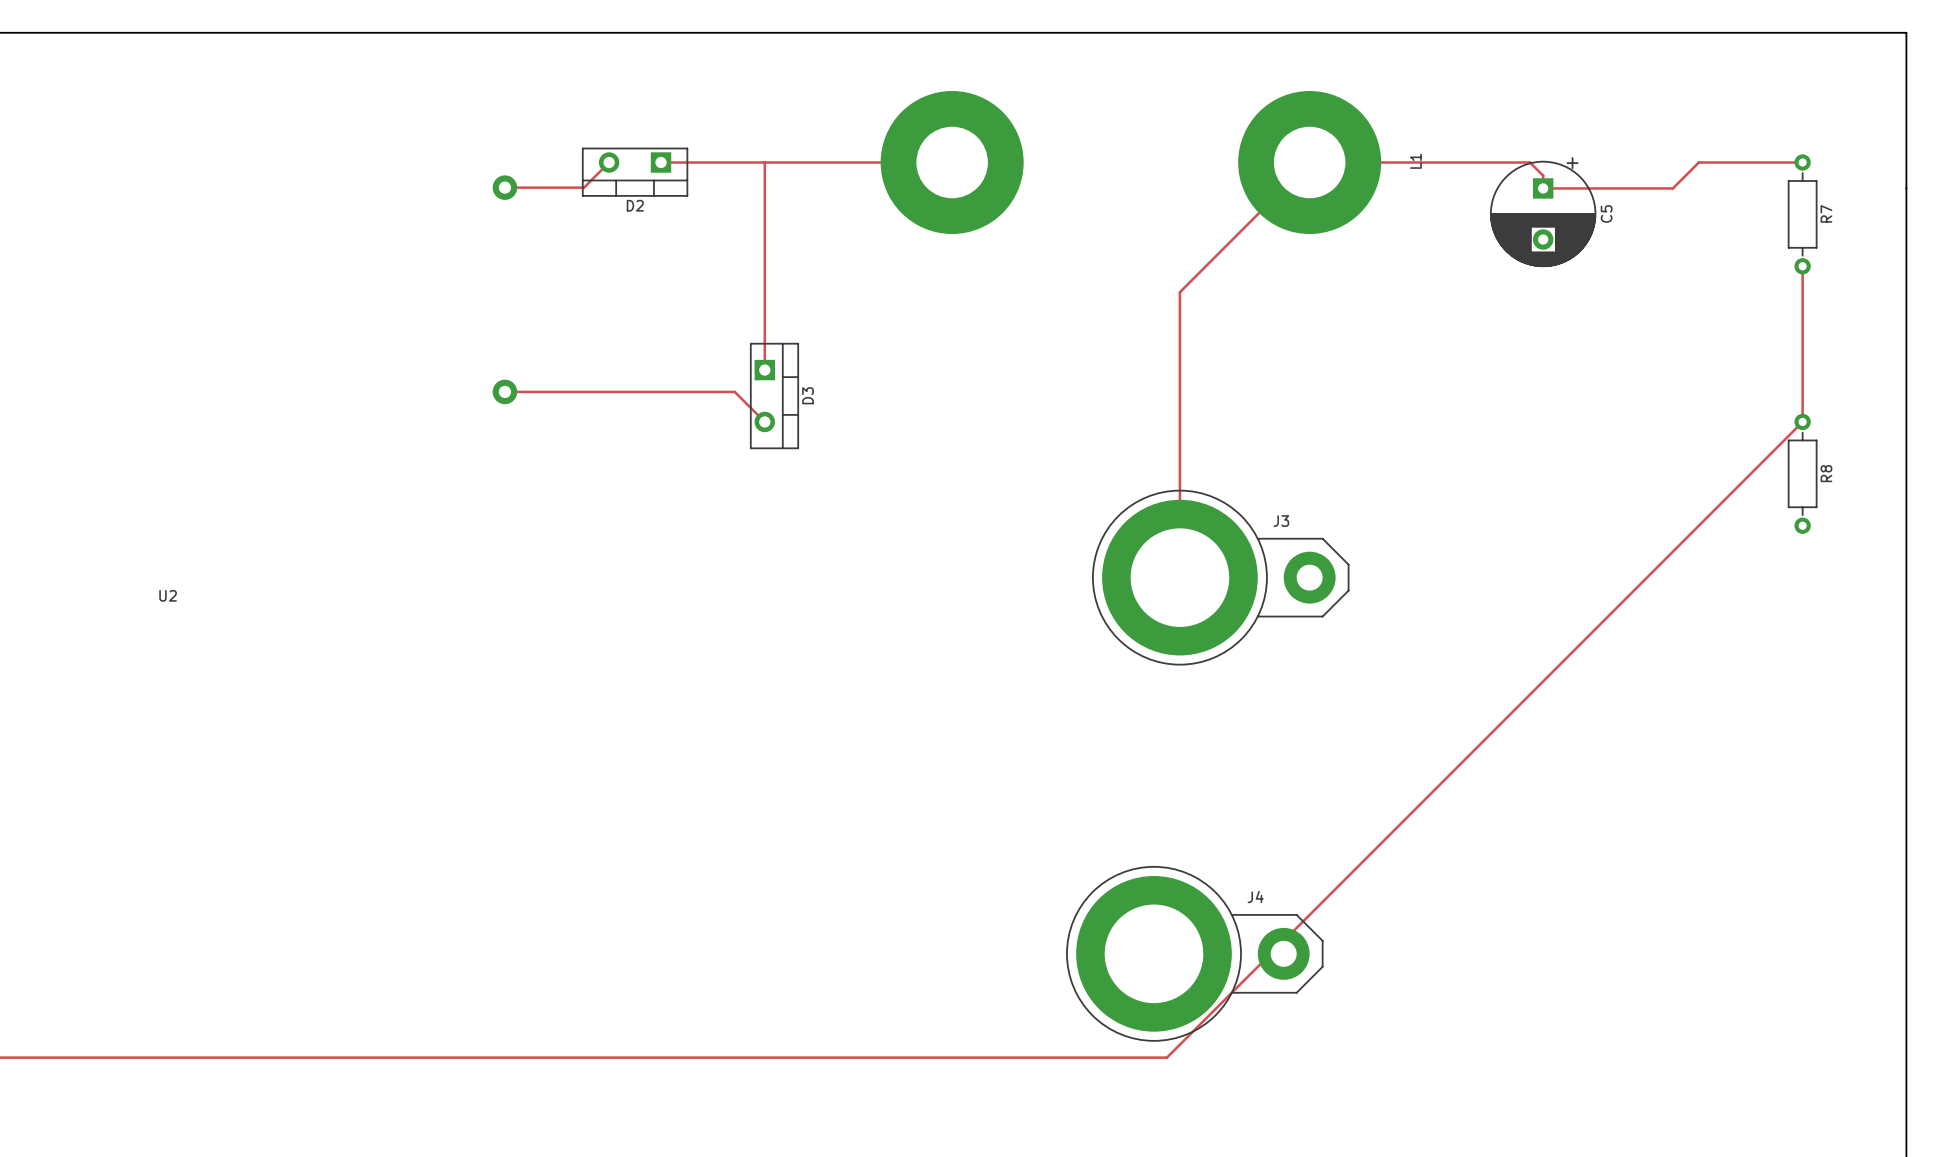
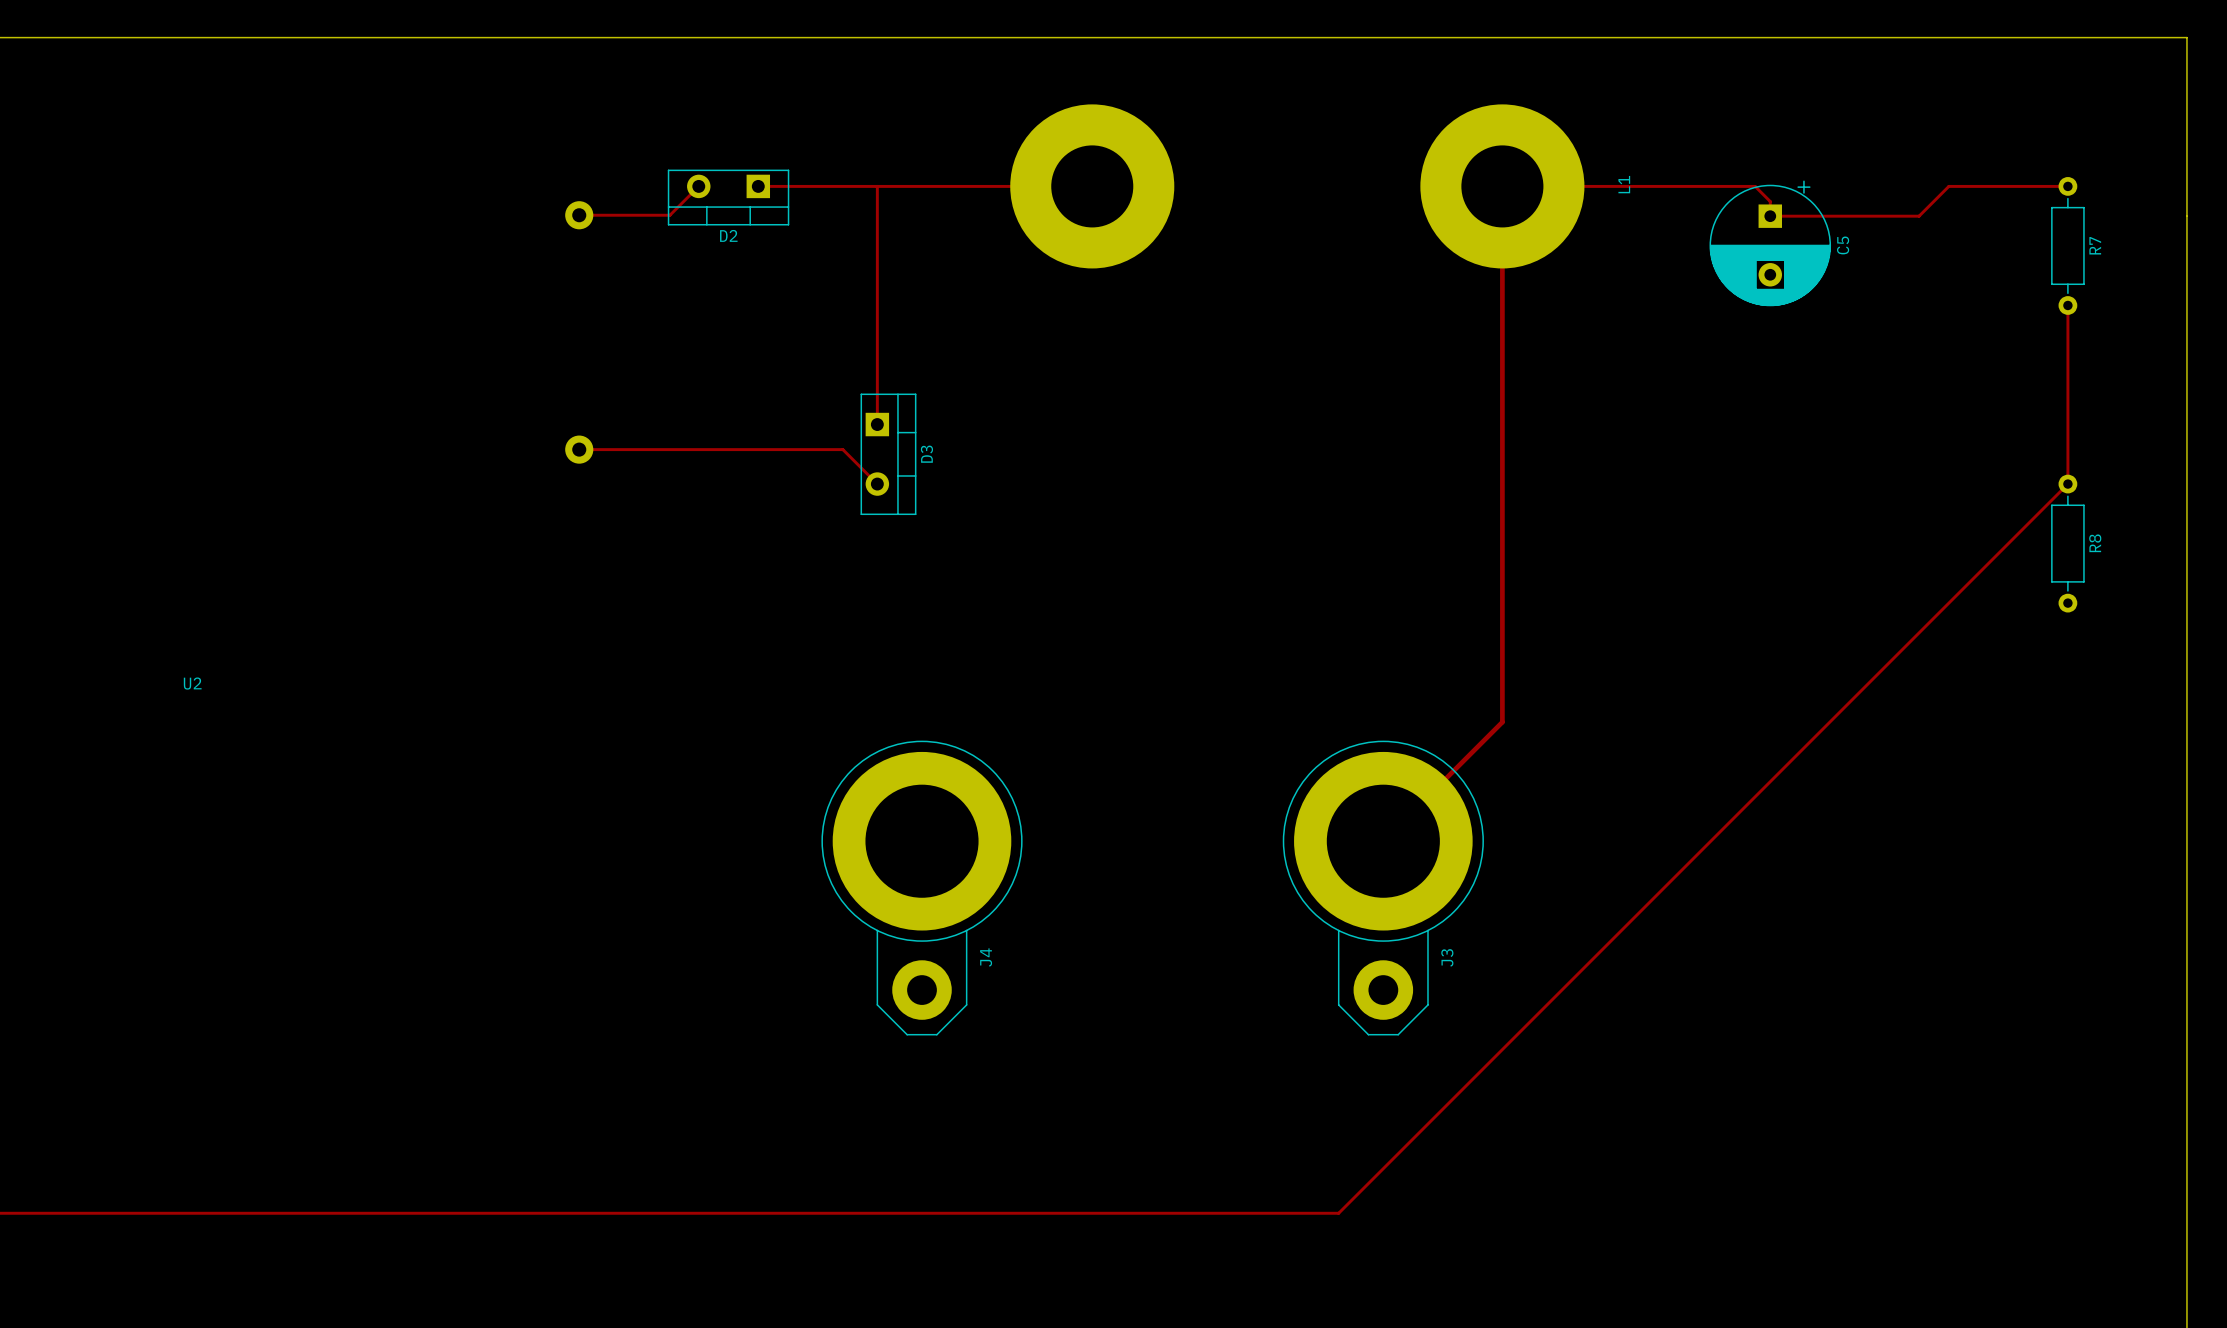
track: (1309, 162) (1179, 292) (1179, 577) -> (1502, 186) (1502, 722) (1383, 841)
J3 rotation: 0° (1220, 577) -> 90° clockwise (1383, 888)
J3 position: (1220, 577) -> (1383, 888)
J4 rotation: 0° (1194, 953) -> 90° clockwise (922, 888)
J4 position: (1194, 953) -> (922, 888)

